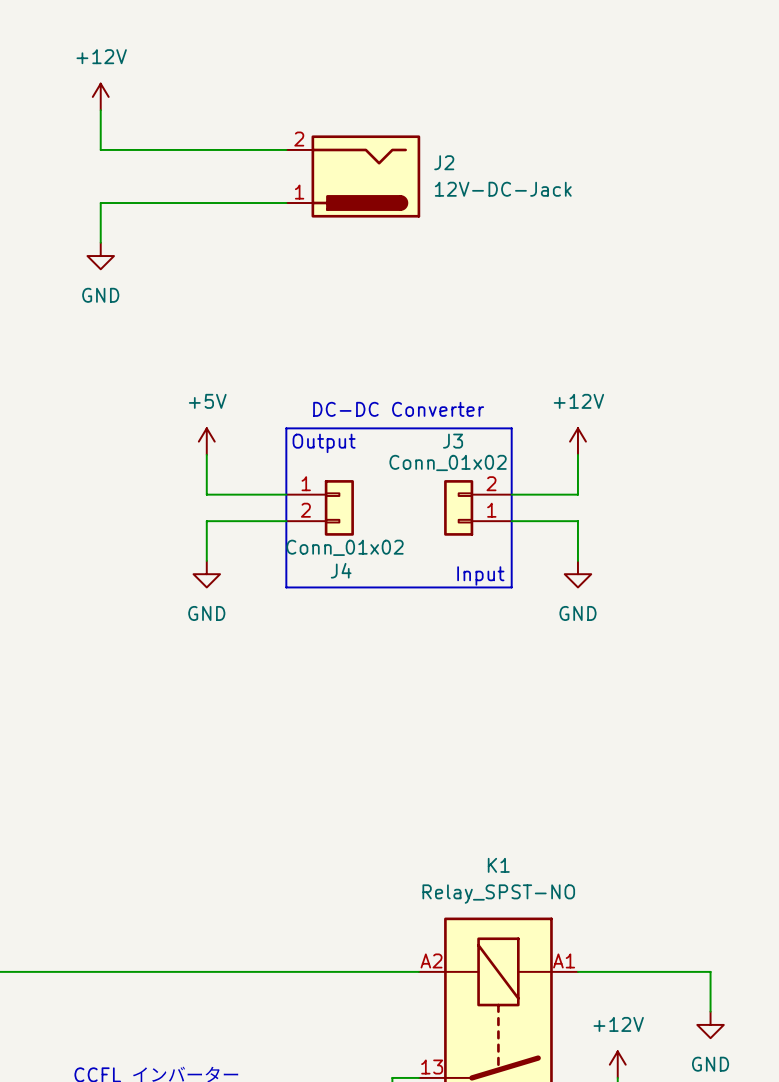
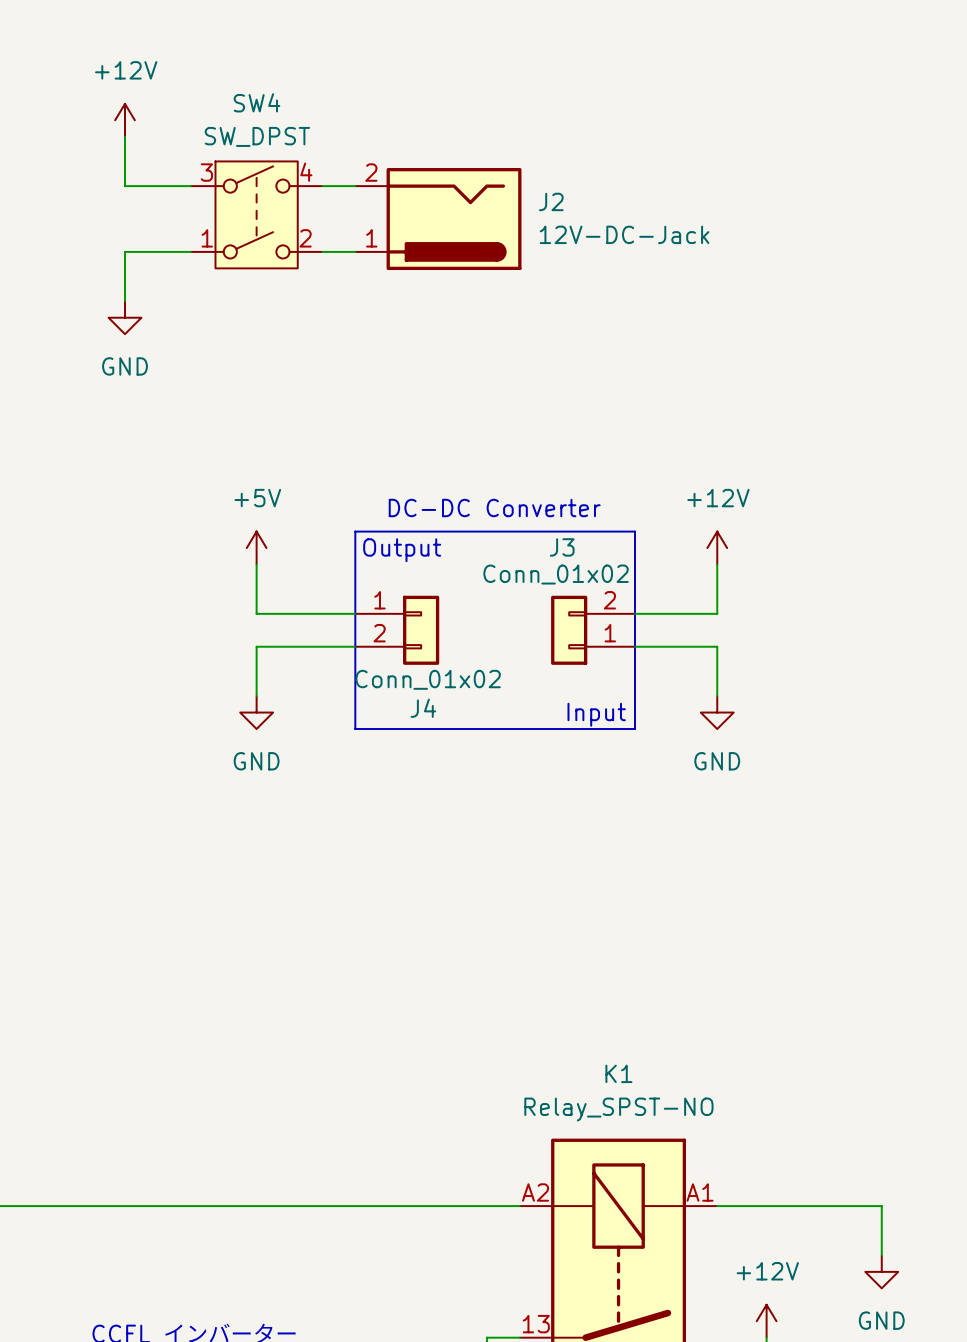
SW4: none -> SW_DPST (256, 214)

